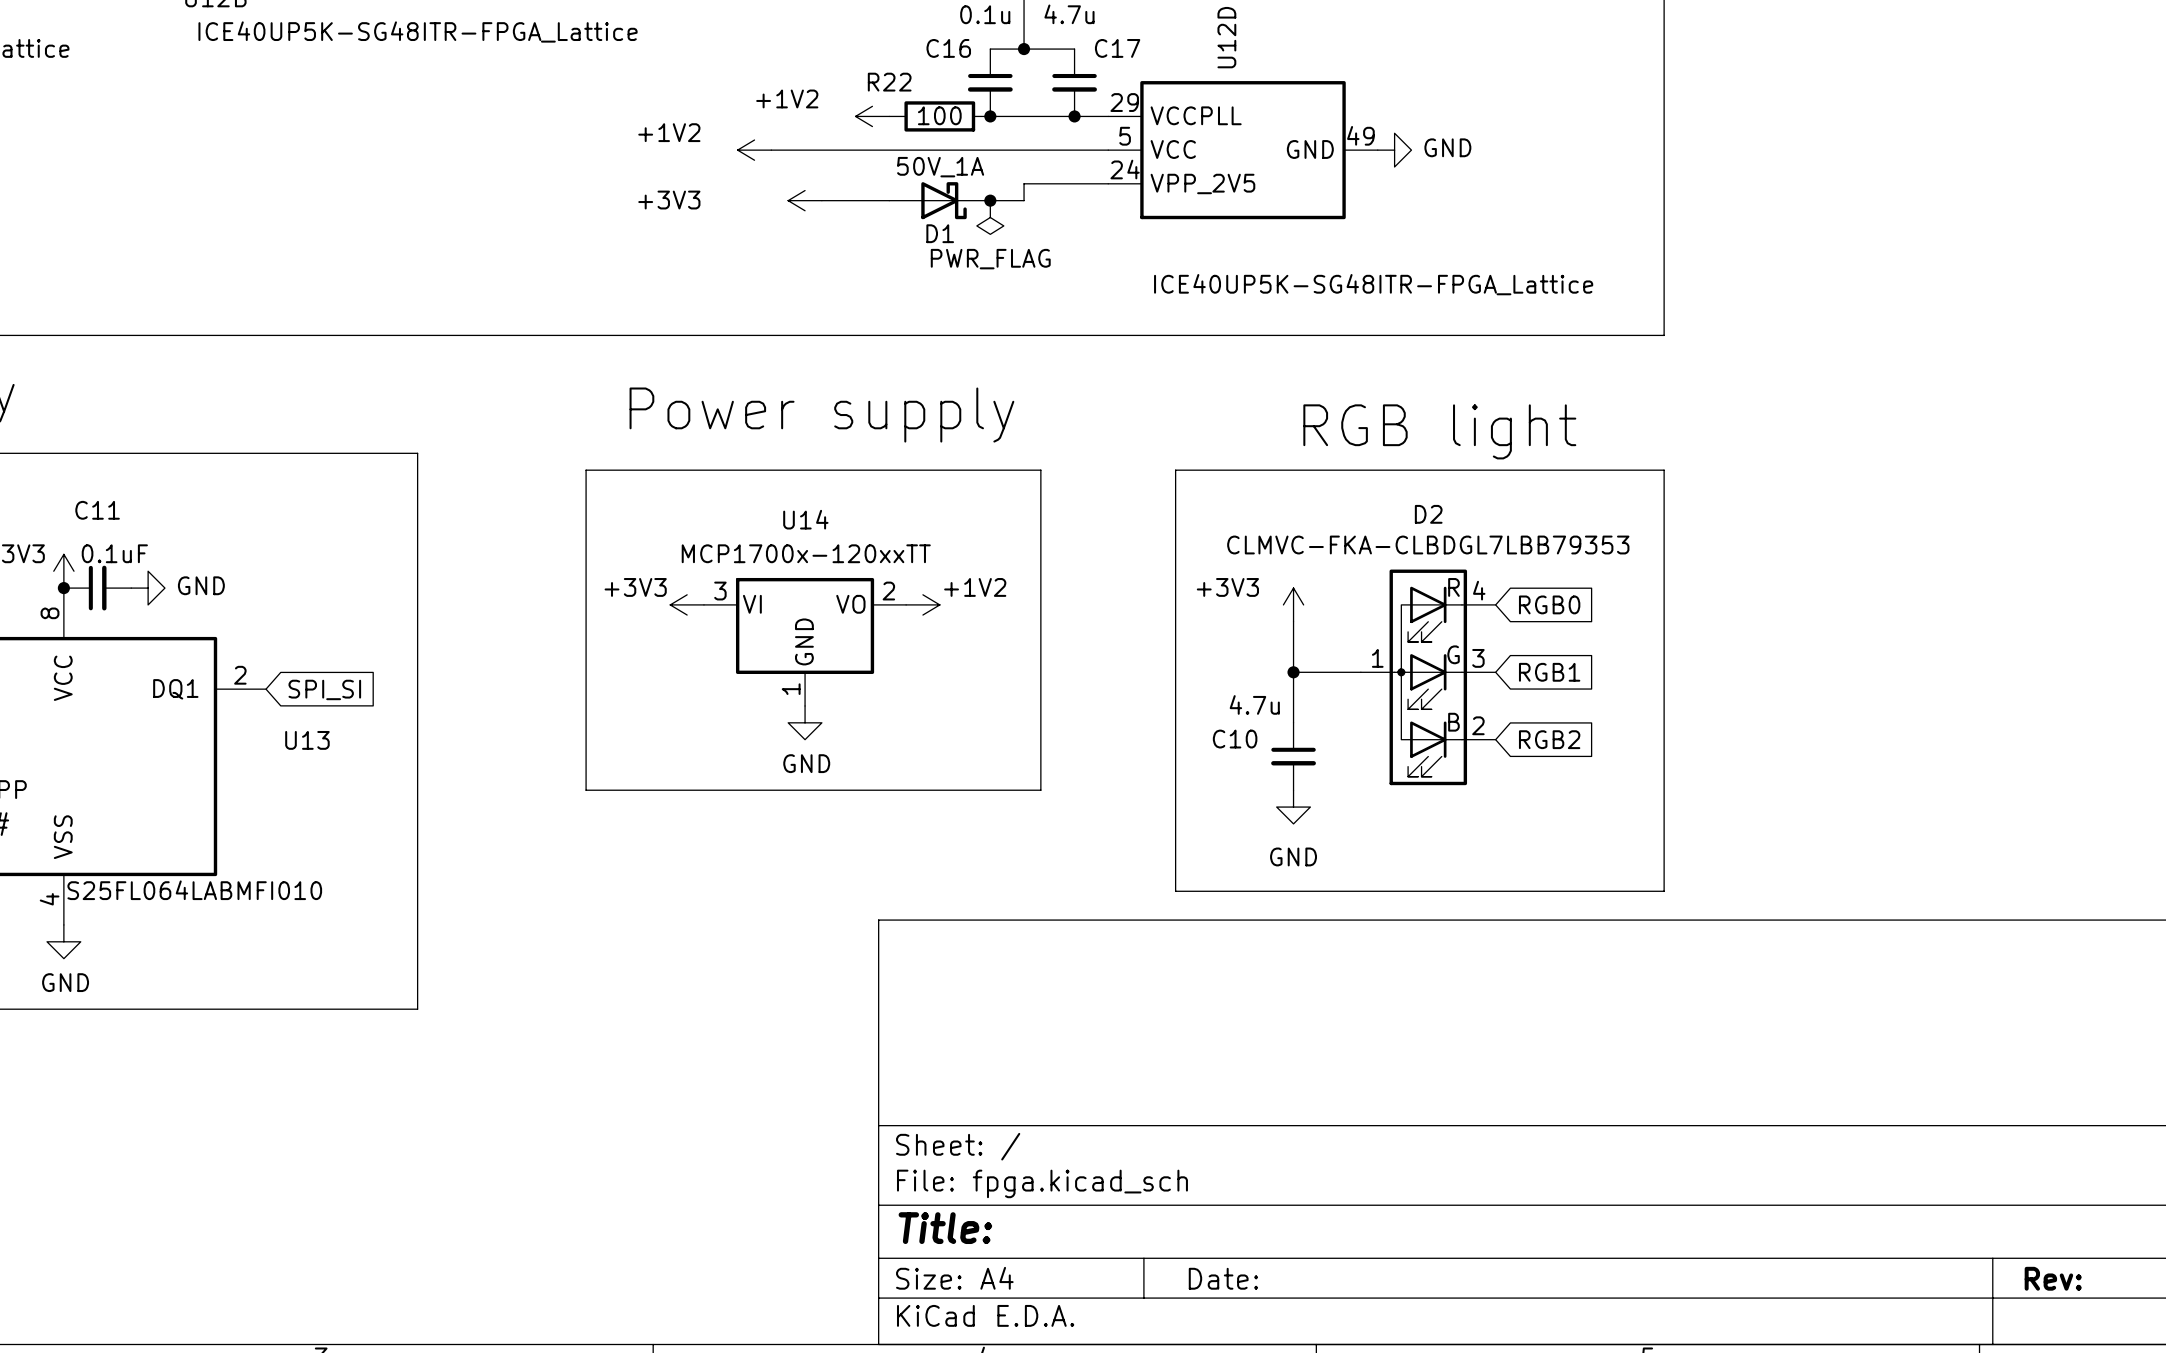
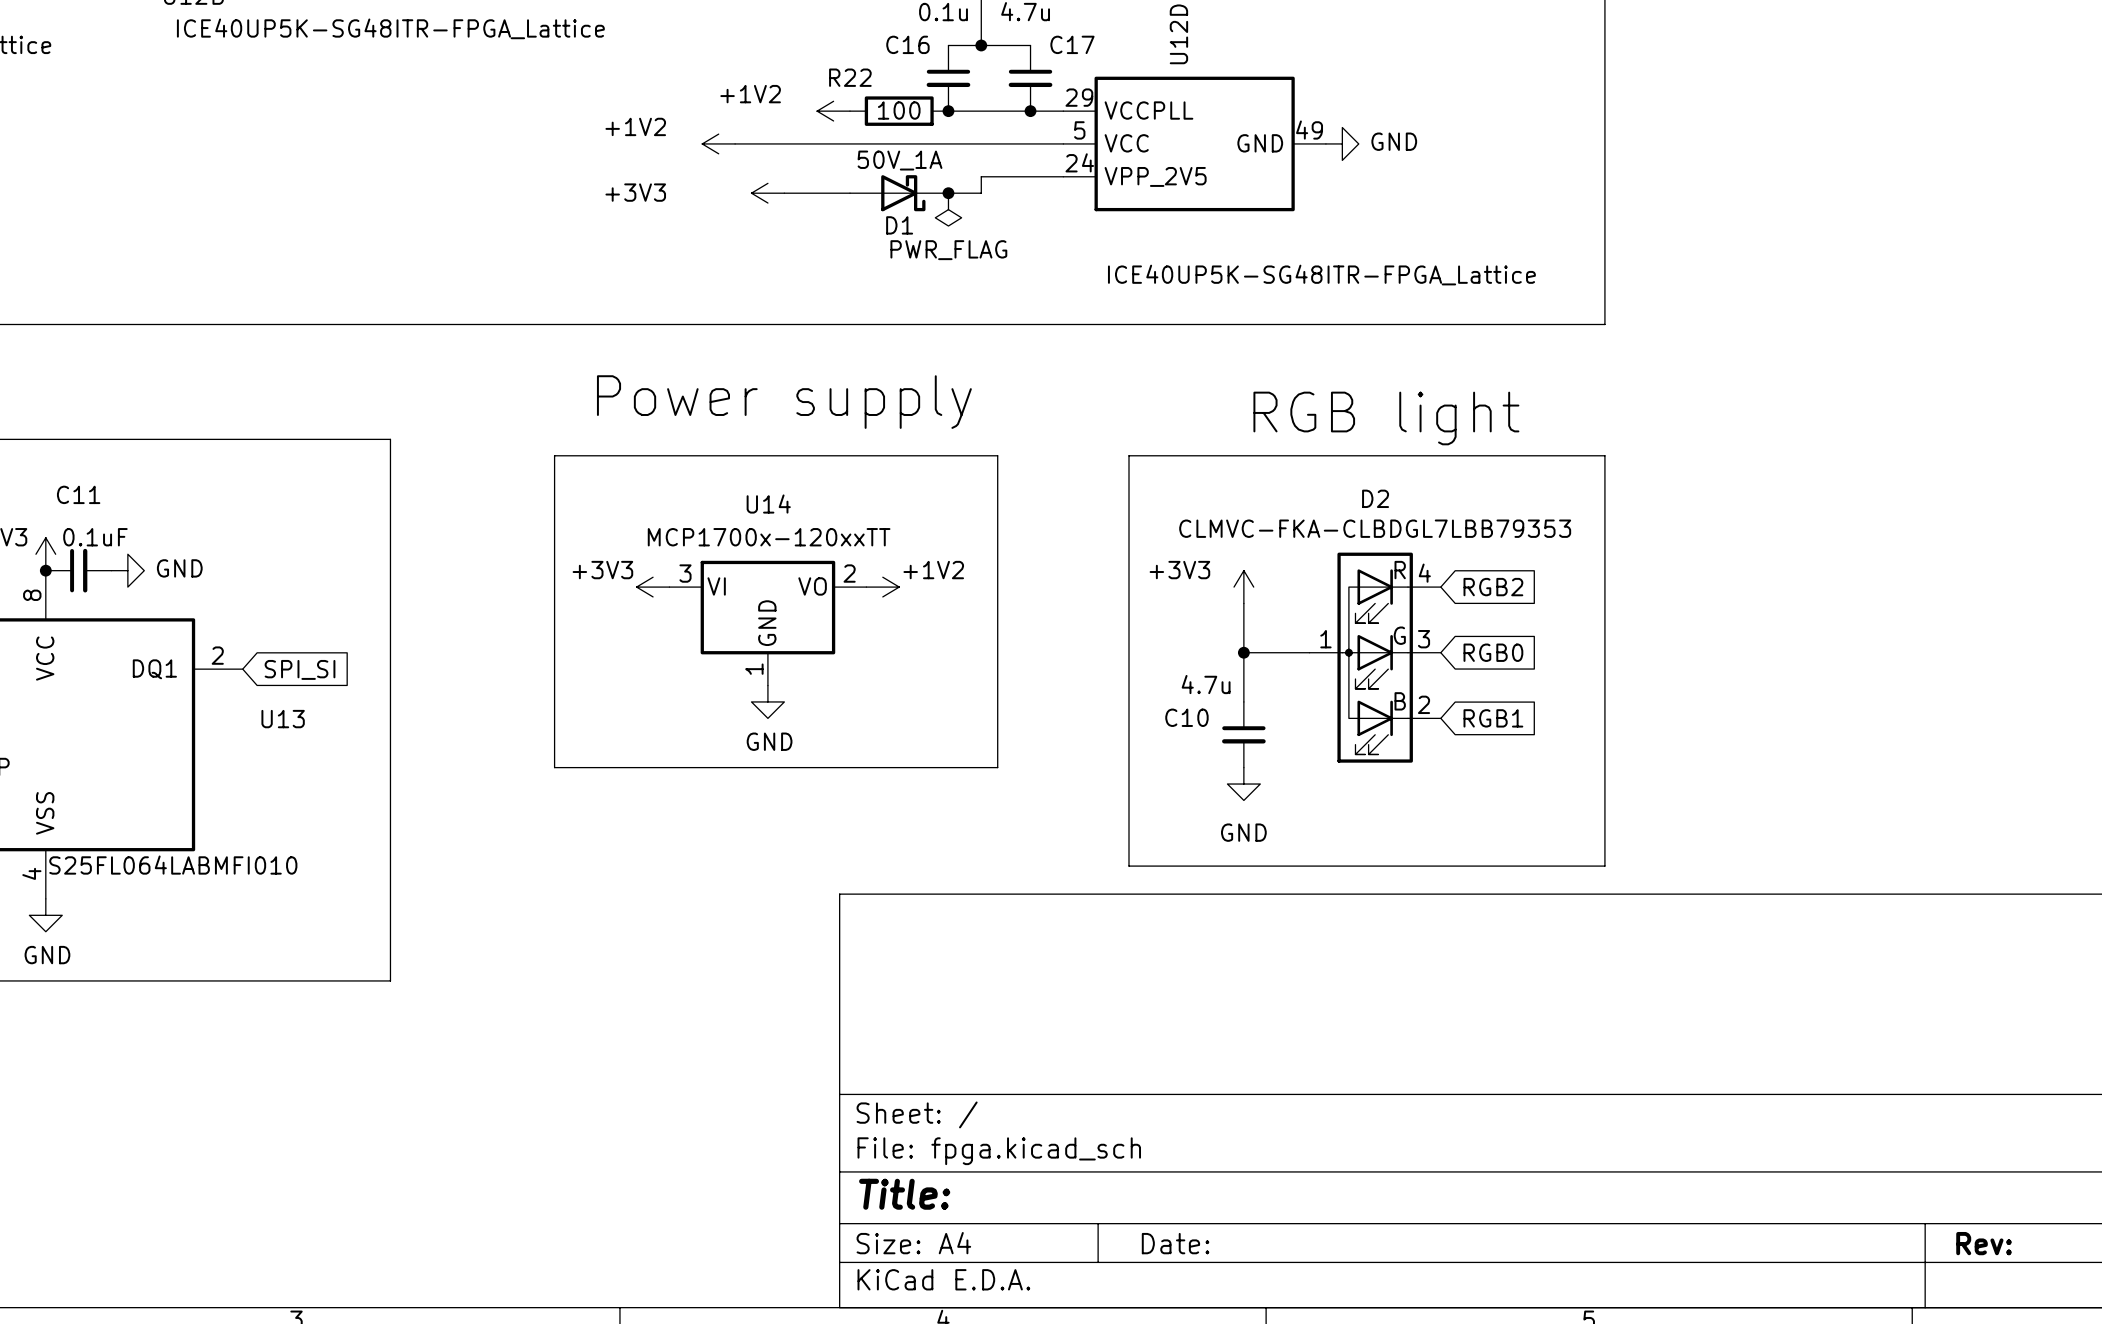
global label: RGB0 (1549, 604) -> RGB2 (1493, 587)
global label: RGB1 (1549, 672) -> RGB0 (1493, 652)
global label: RGB2 (1549, 739) -> RGB1 (1493, 718)

